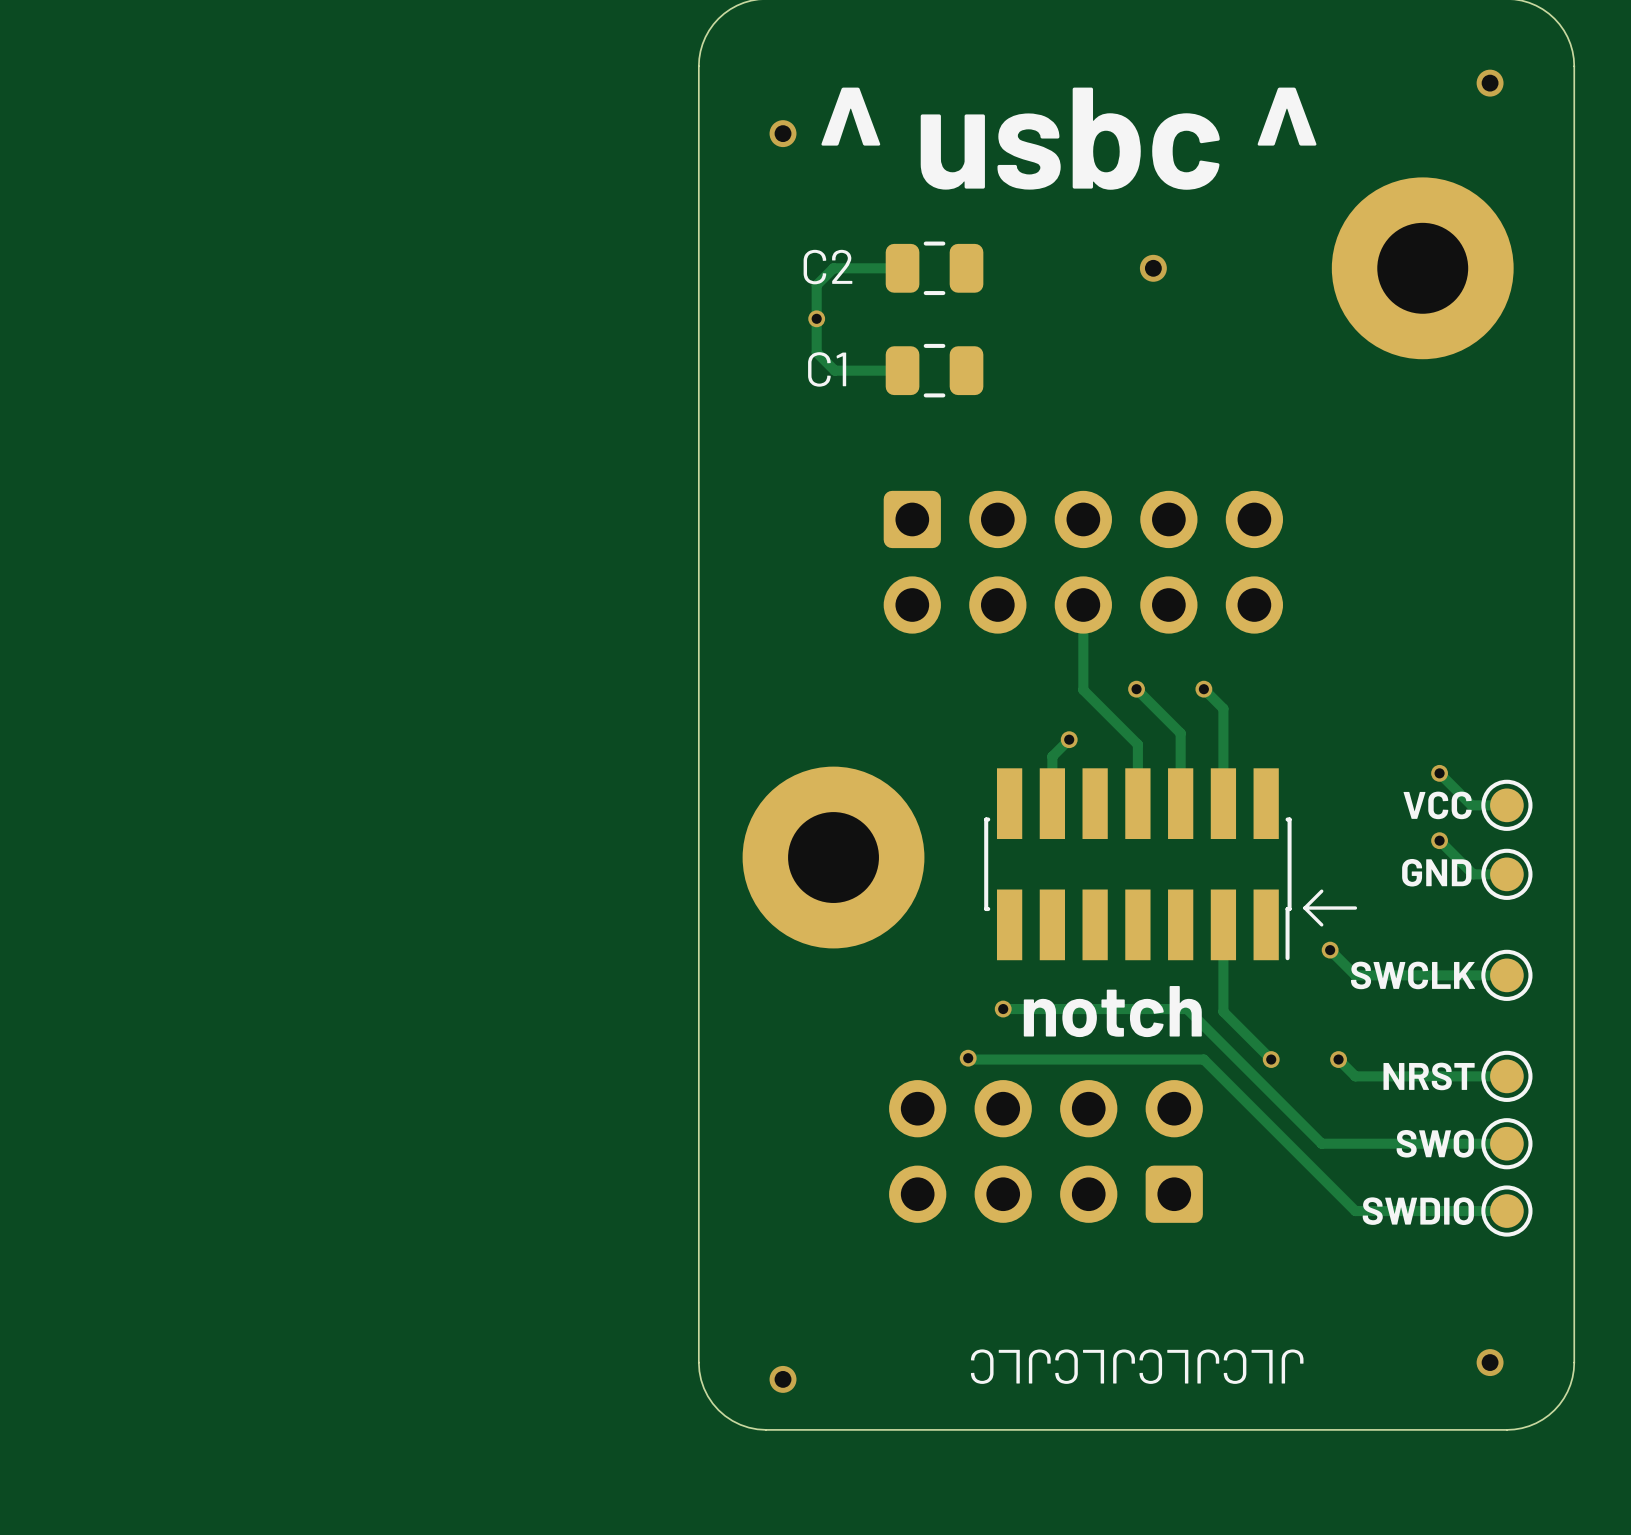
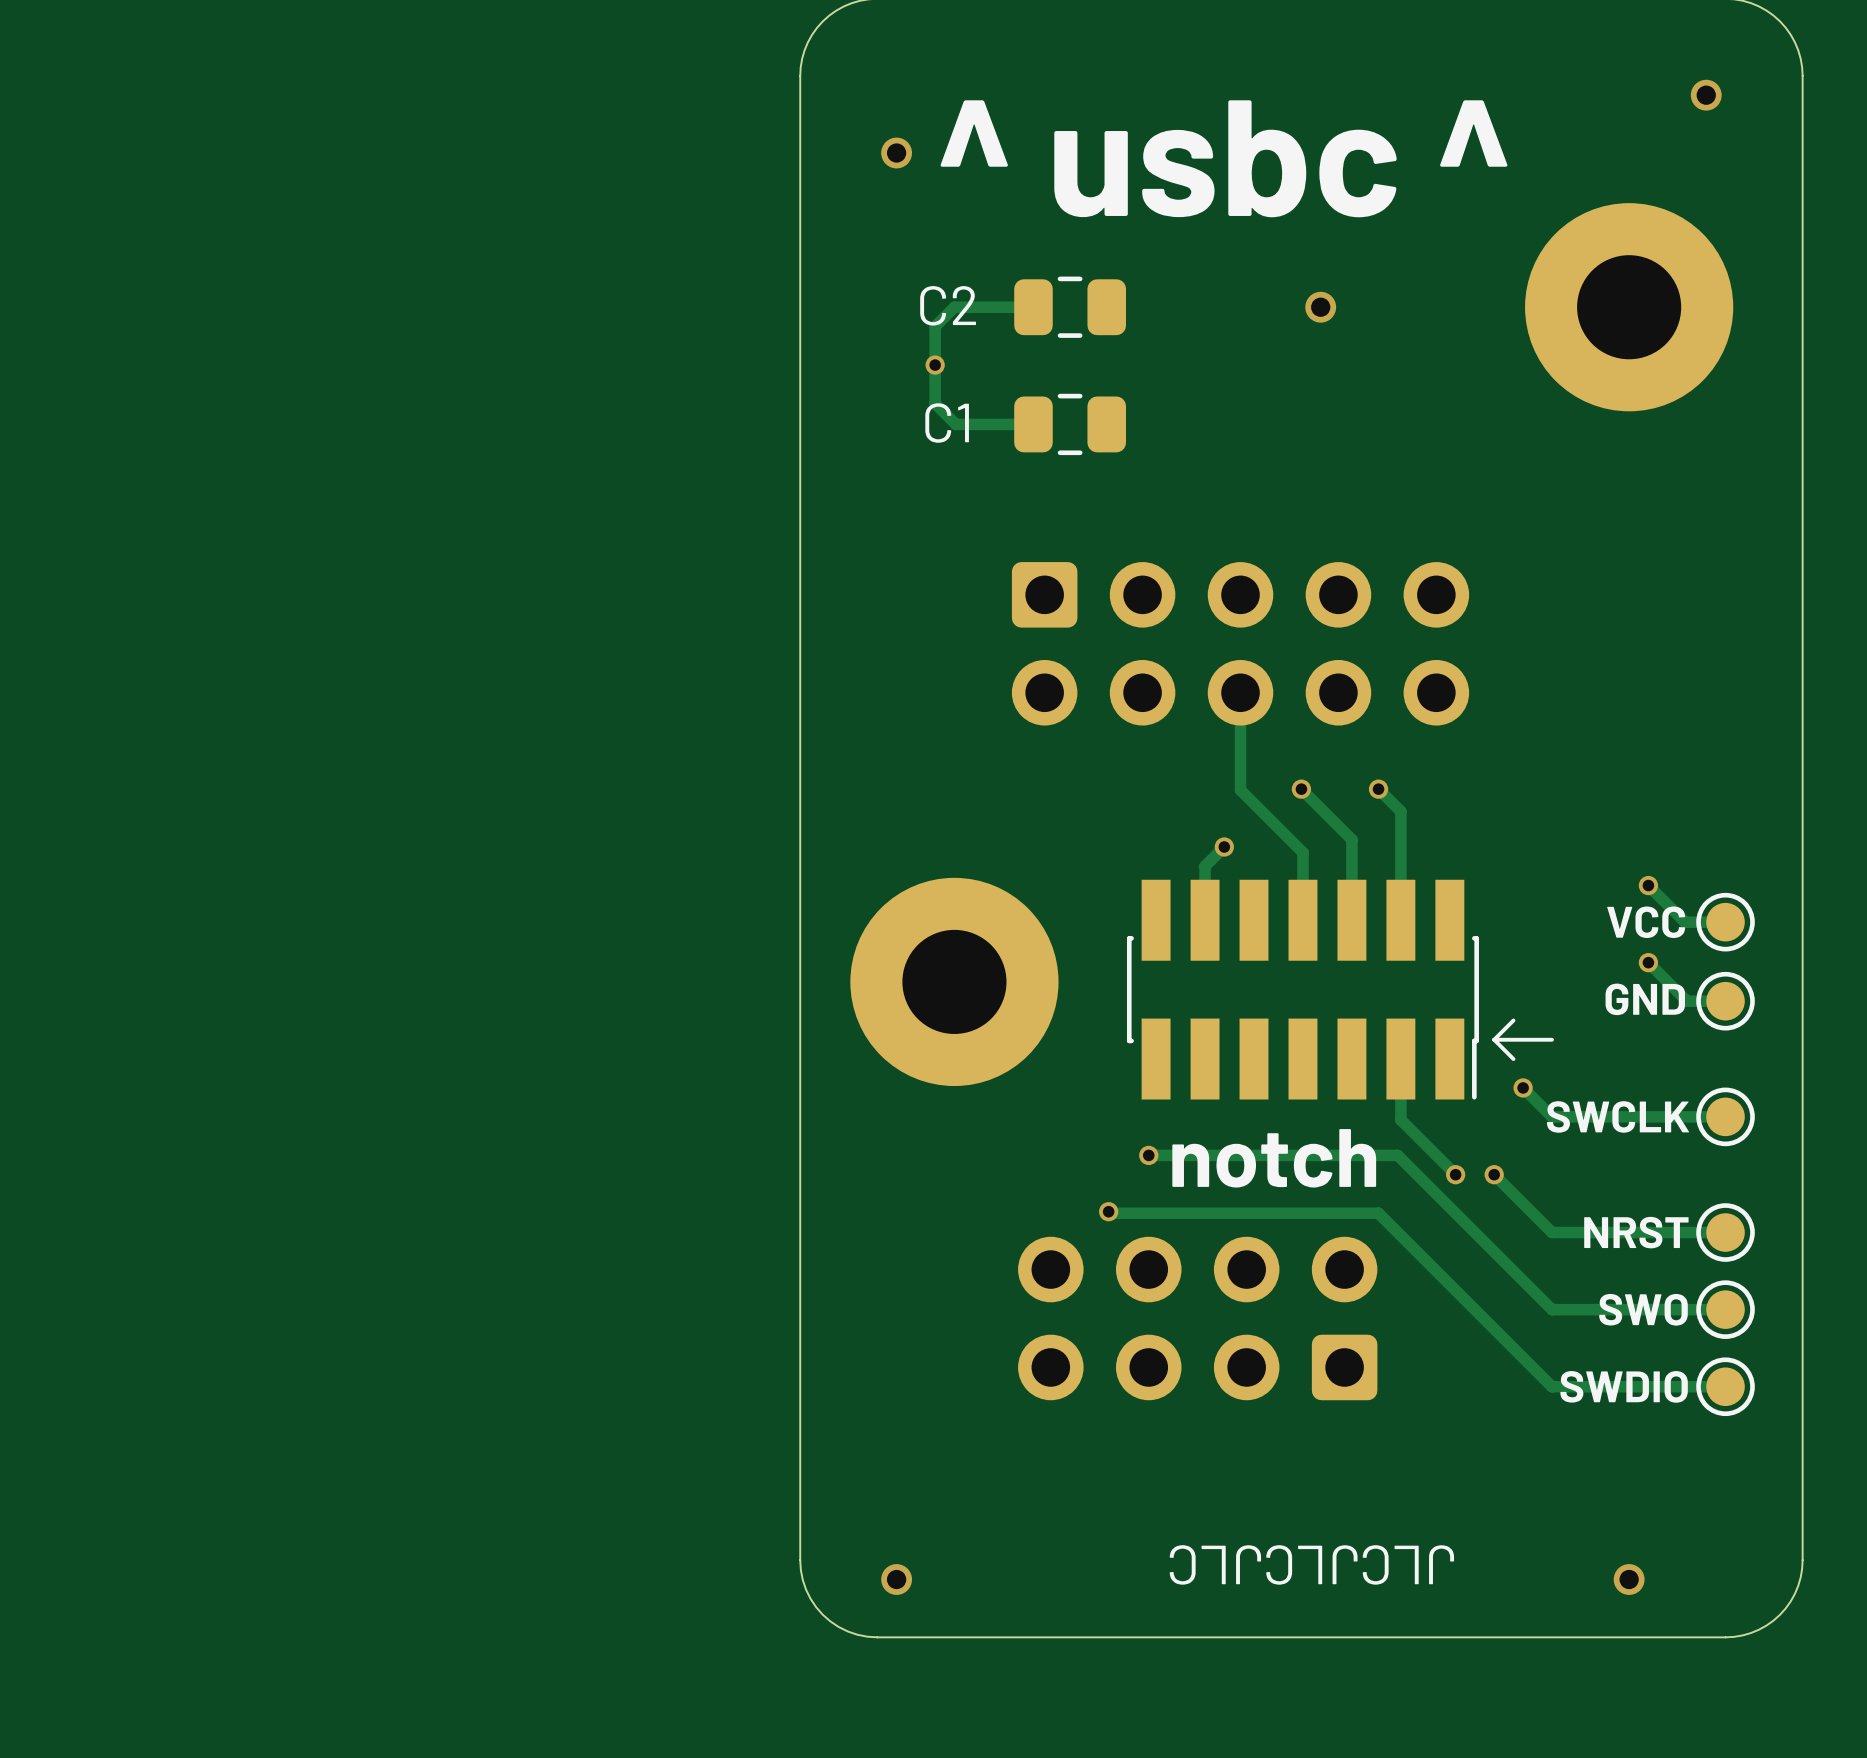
track: (1223, 978) (1223, 1011) -> (1359, 1155) (1397, 1155) (1400, 1158)
track: none -> (1400, 1119) (1455, 1174)
track: (1187, 1009) (1321, 1143) (1355, 1143) -> (1455, 1213) (1552, 1309)
via: none -> (1455, 1174)
track: none -> (1494, 1174) (1532, 1213)
via: none -> (1494, 1174)
via: (1271, 1059) -> none
via: (1338, 1059) -> none
via position: (1490, 1362) -> (1629, 1579)
text: JLCJLCJLCJLC (1137, 1366) -> JLCJLCJLC (1311, 1564)

